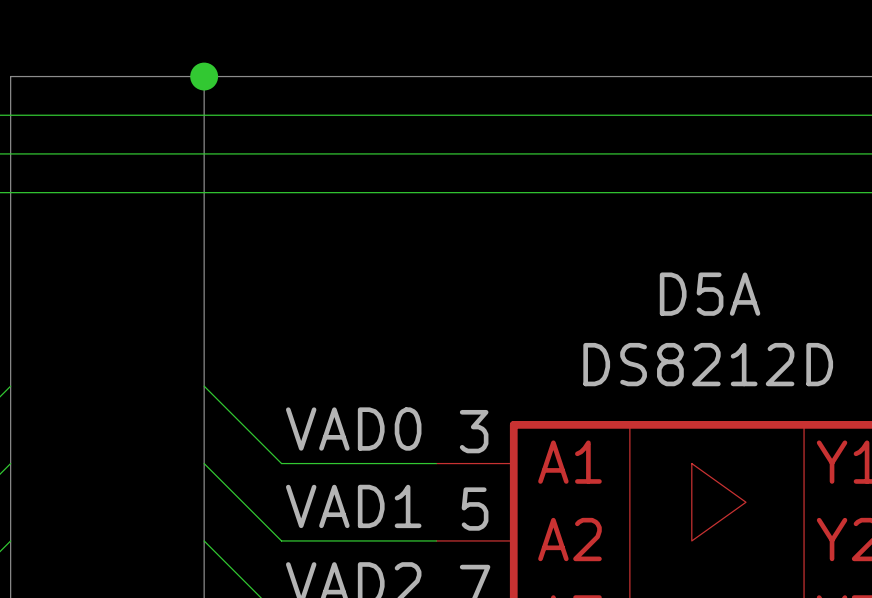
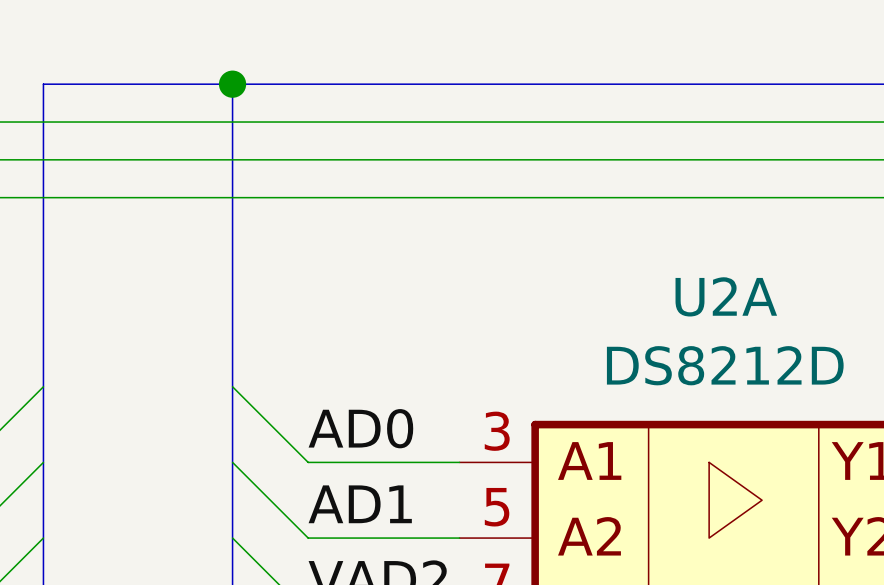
D5A name: D5A (710, 294) -> U2A (726, 296)
label: VAD0 (353, 429) -> AD0 (360, 428)
label: VAD1 (353, 506) -> AD1 (360, 504)

